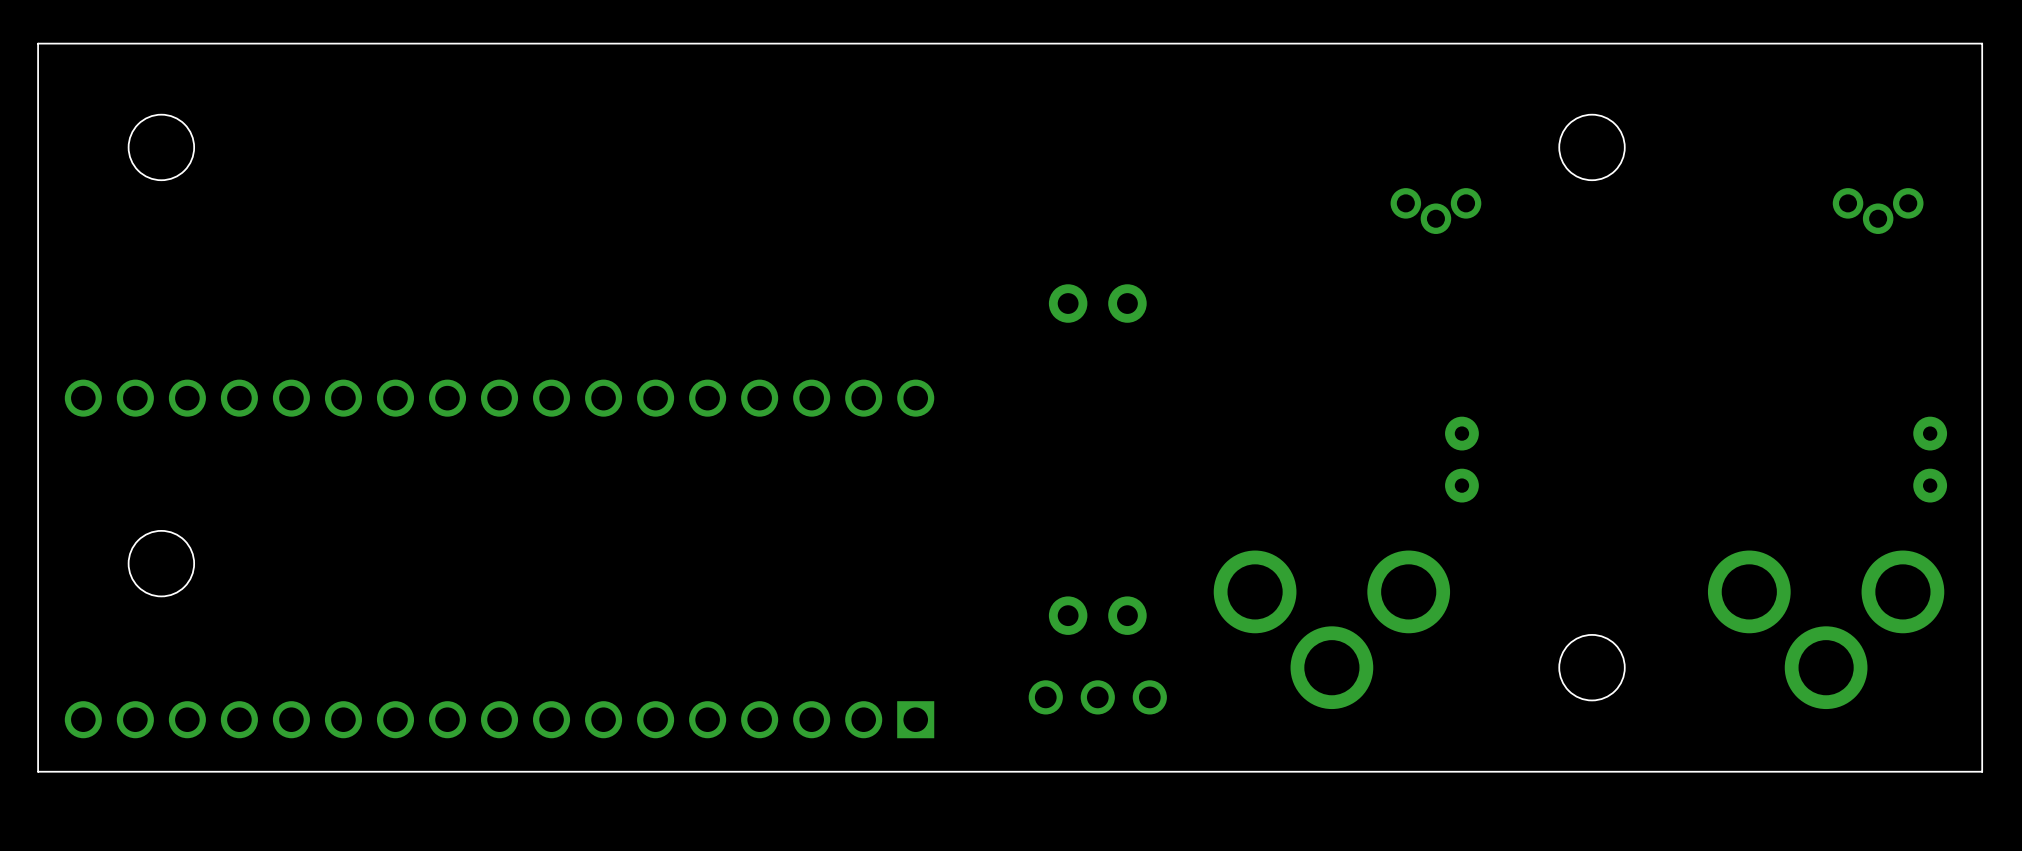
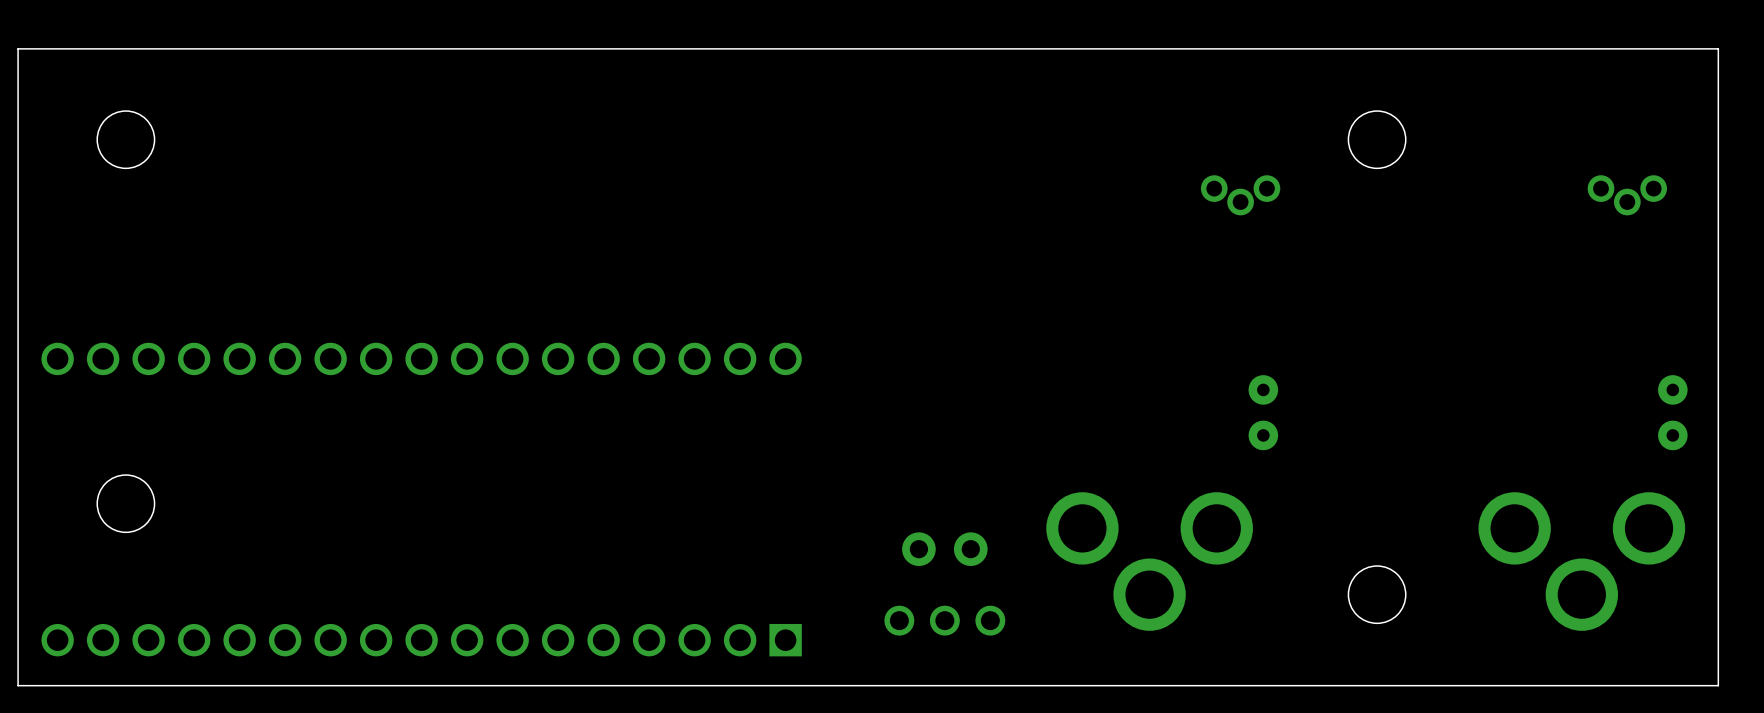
part: (1097, 303) -> none

